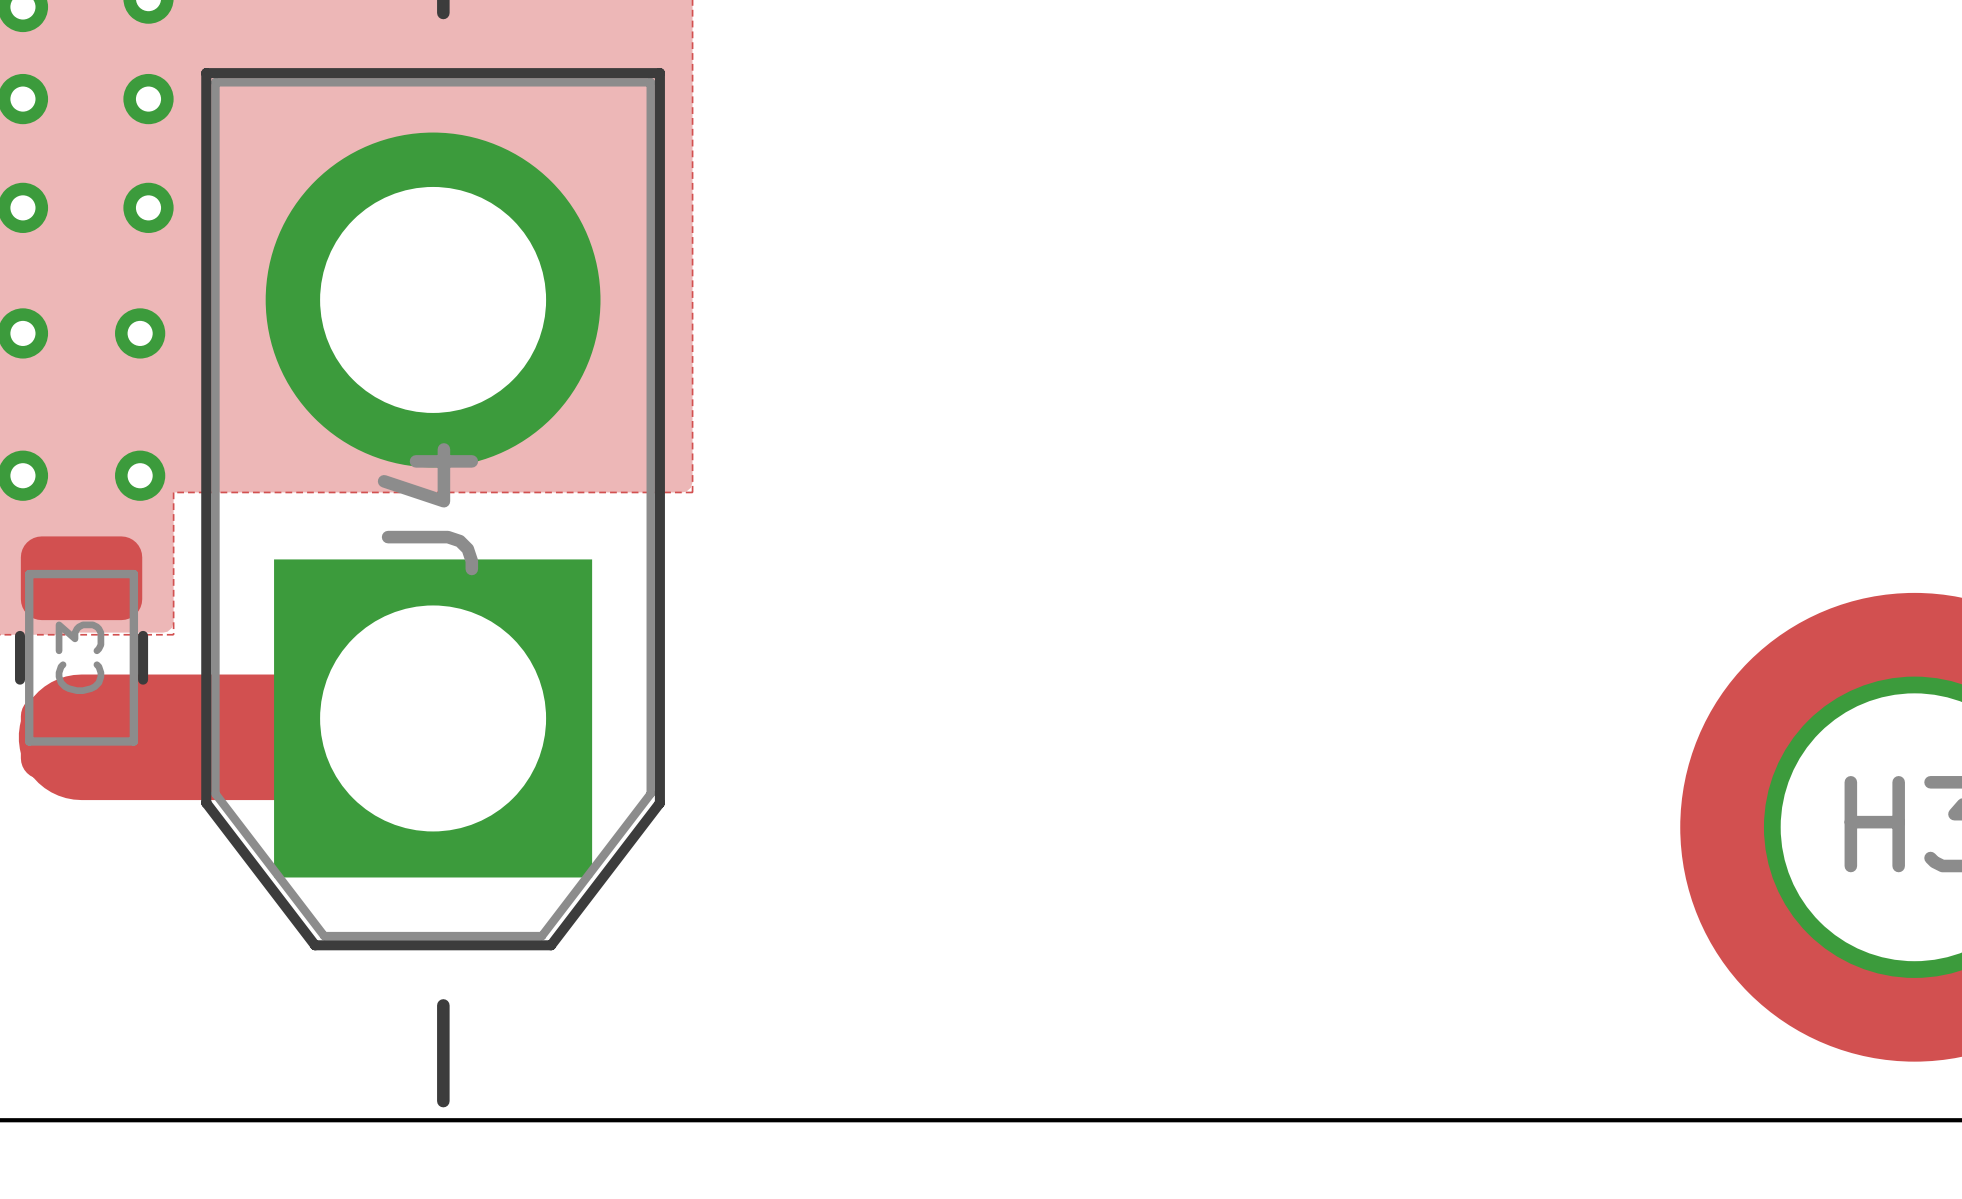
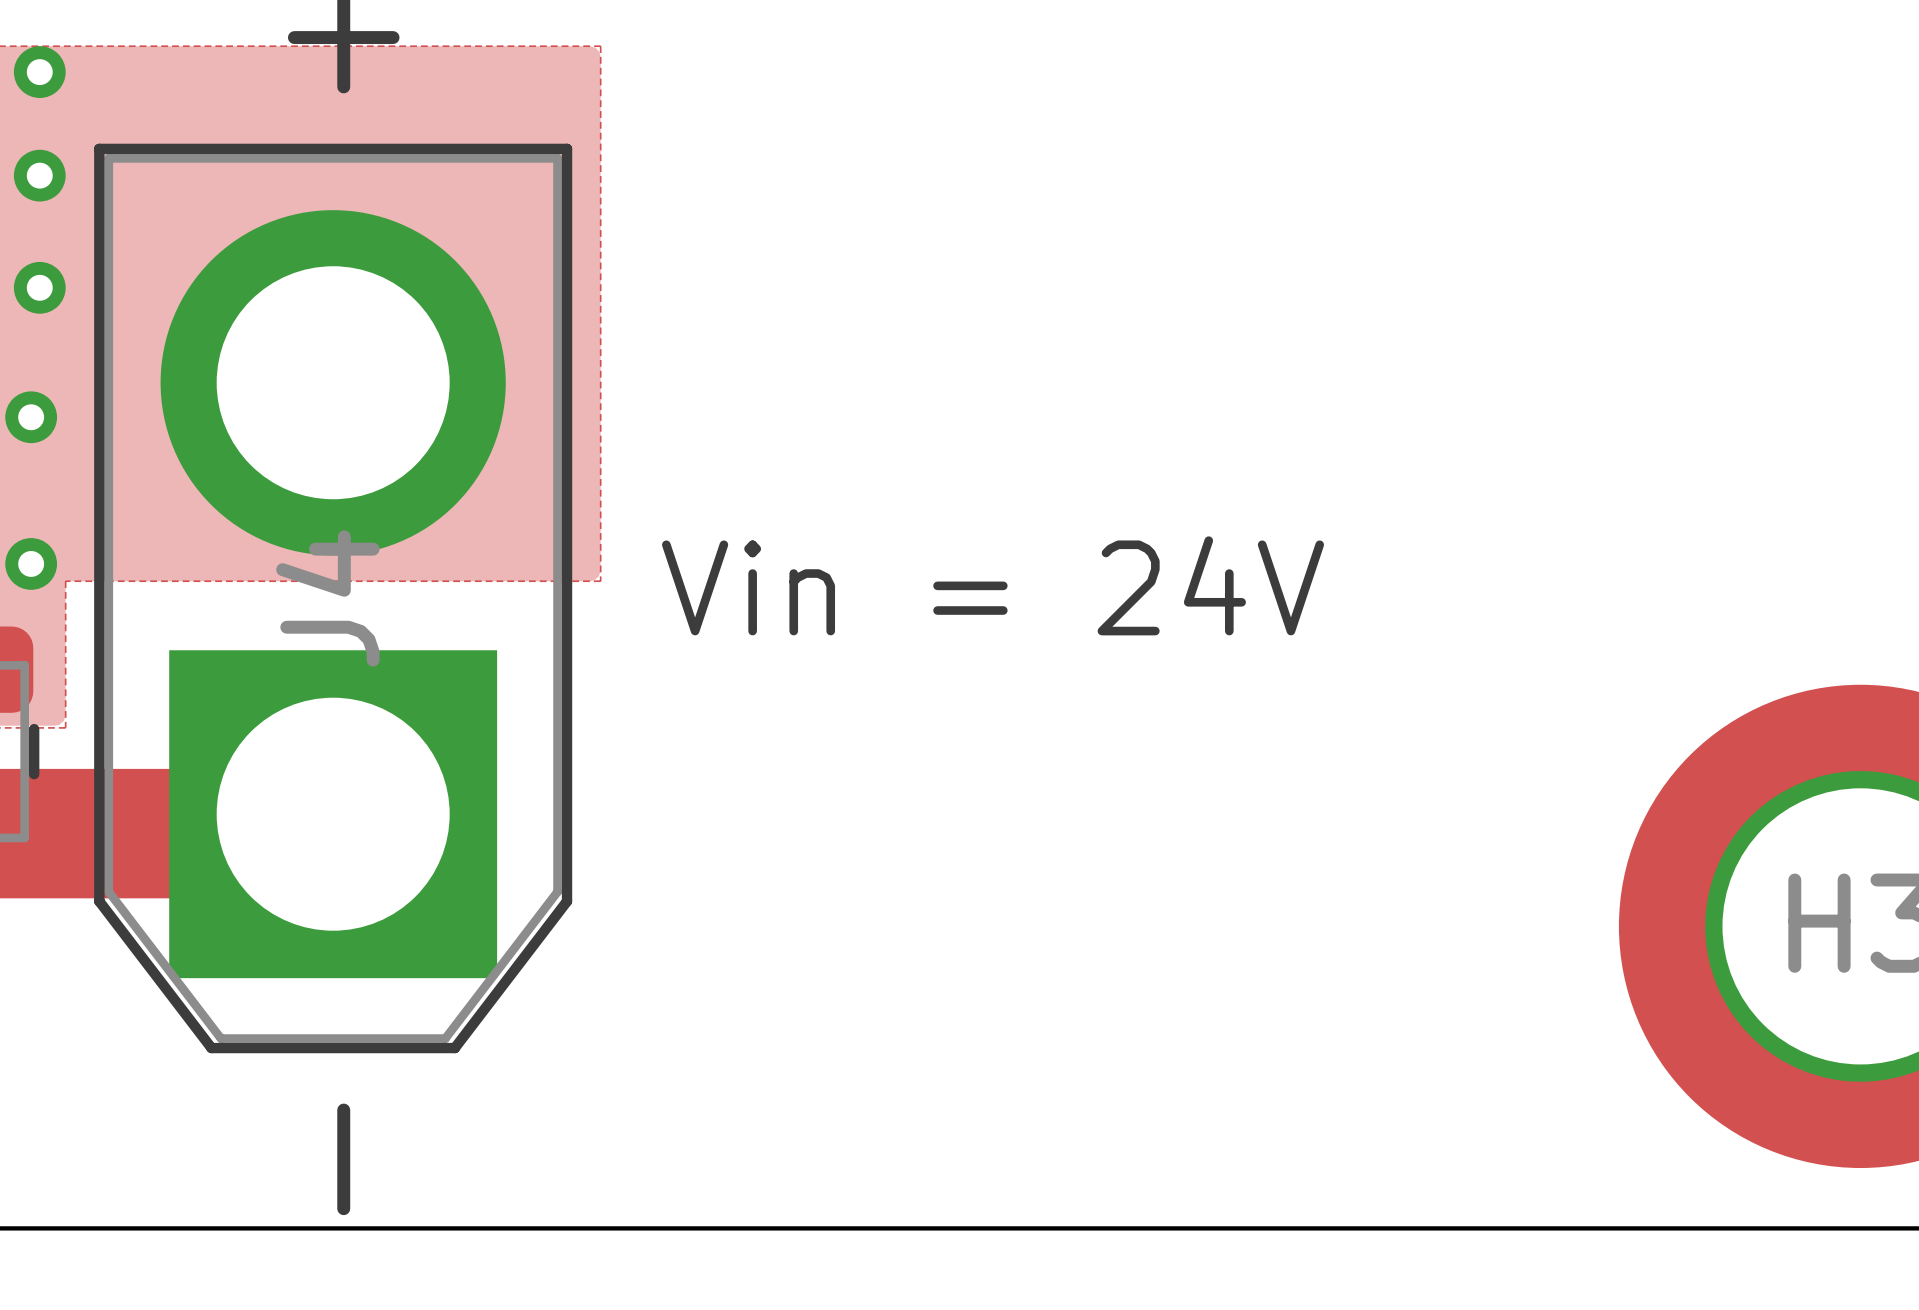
text: none -> Vin = 24V (993, 585)

